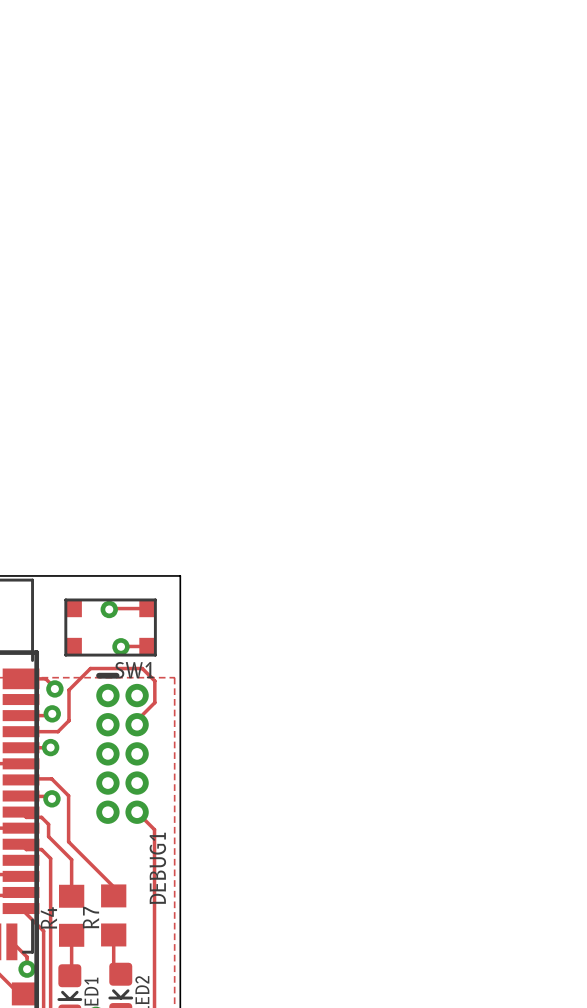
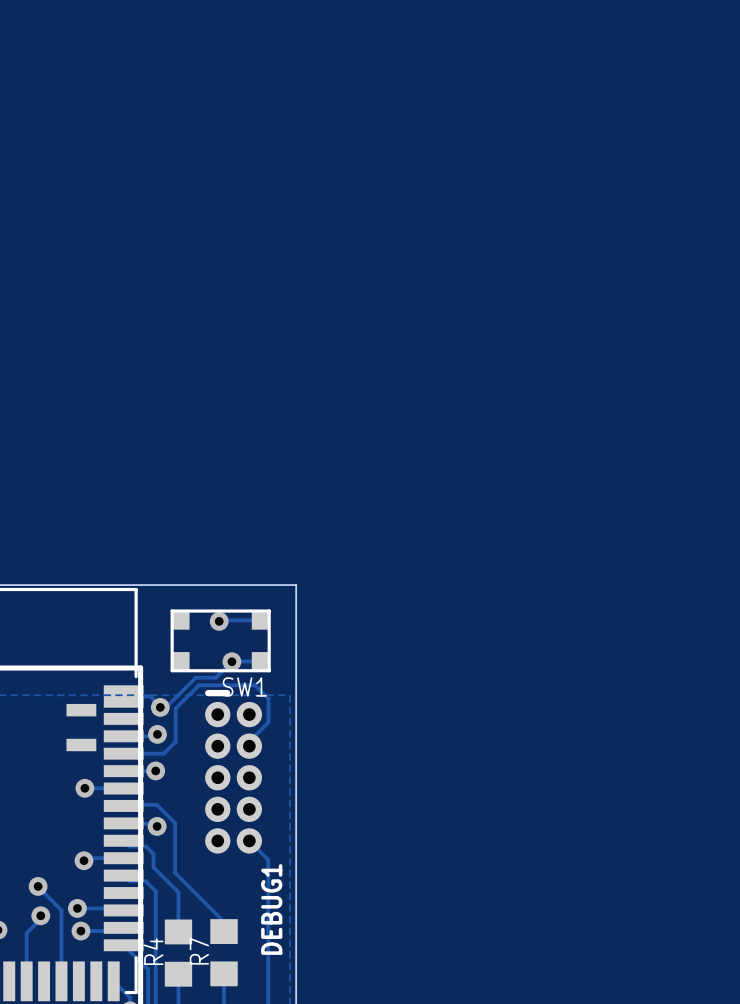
track: none -> (231, 661) (215, 677) (195, 677) (166, 707) (160, 707)

